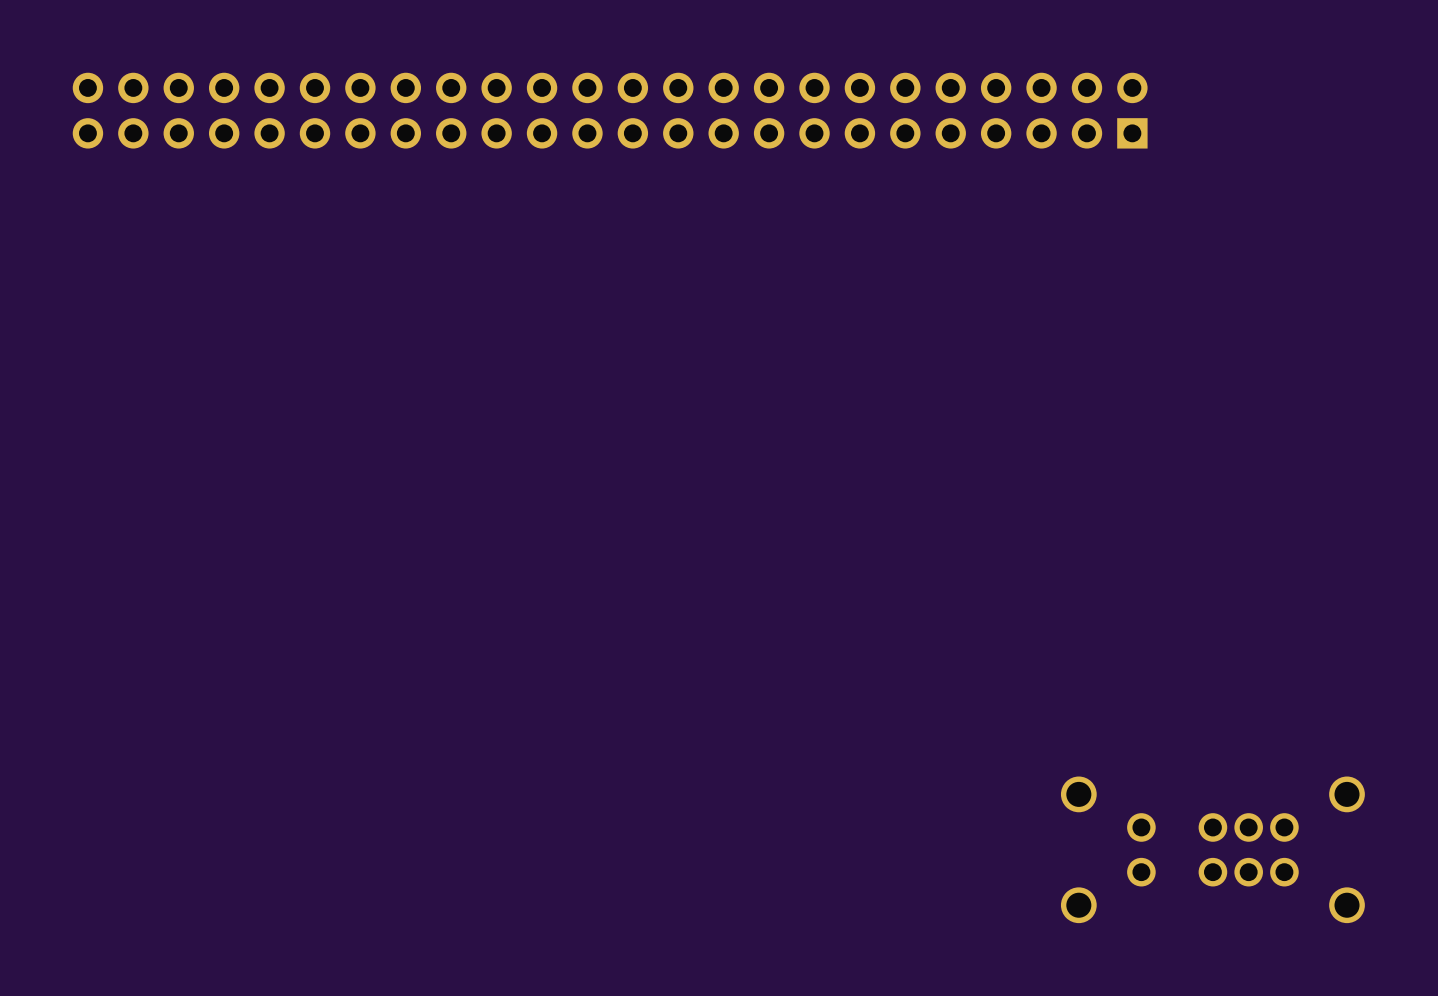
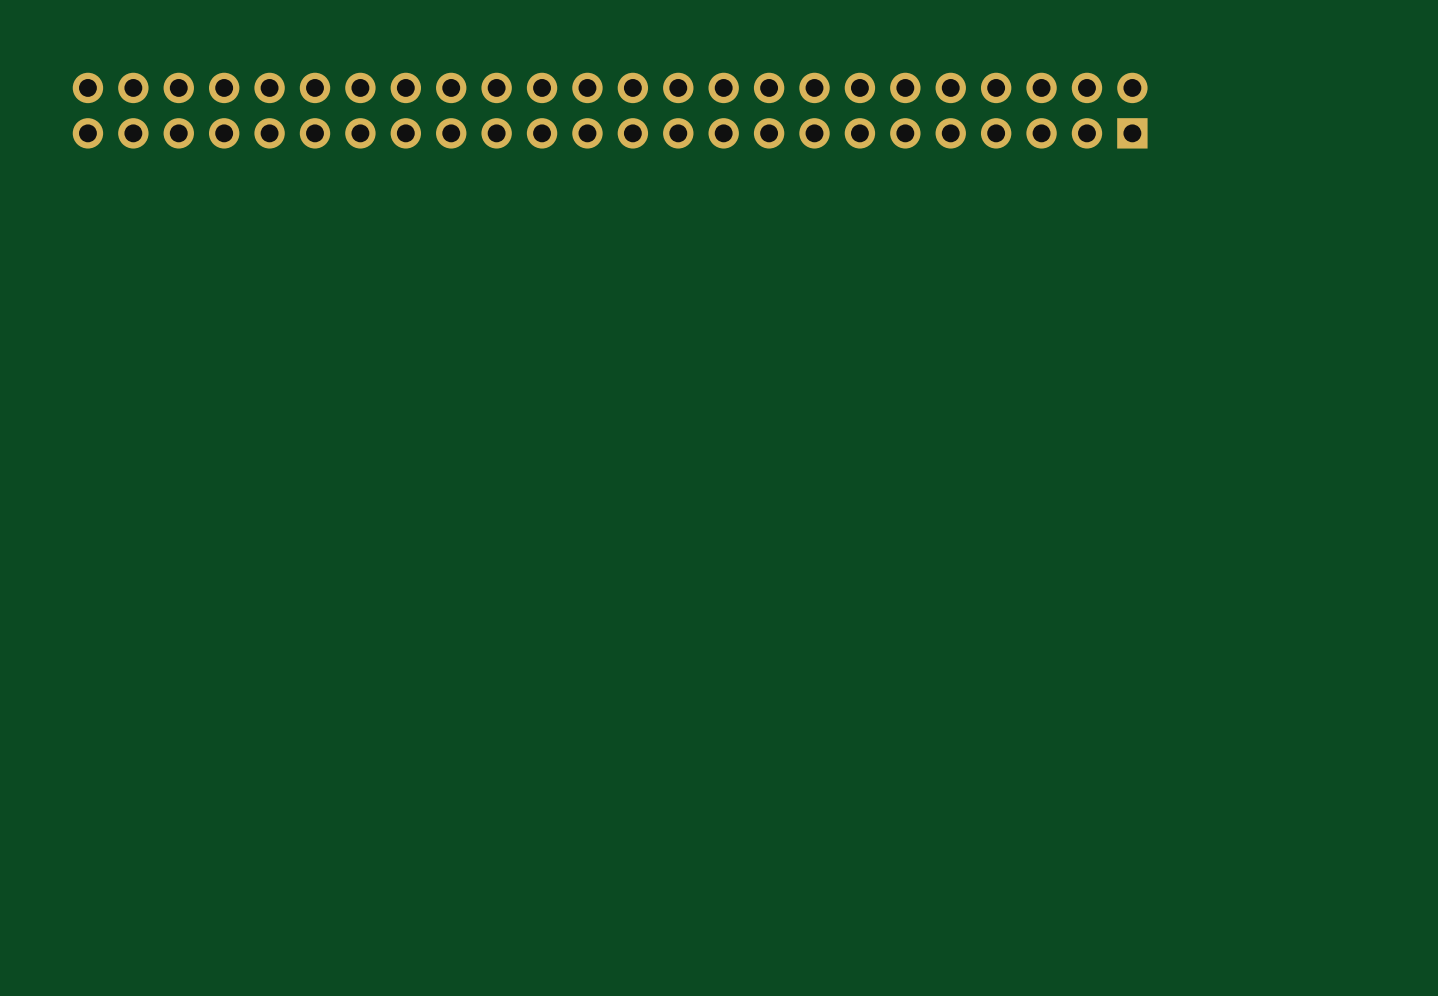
part: (1212, 849) -> none

